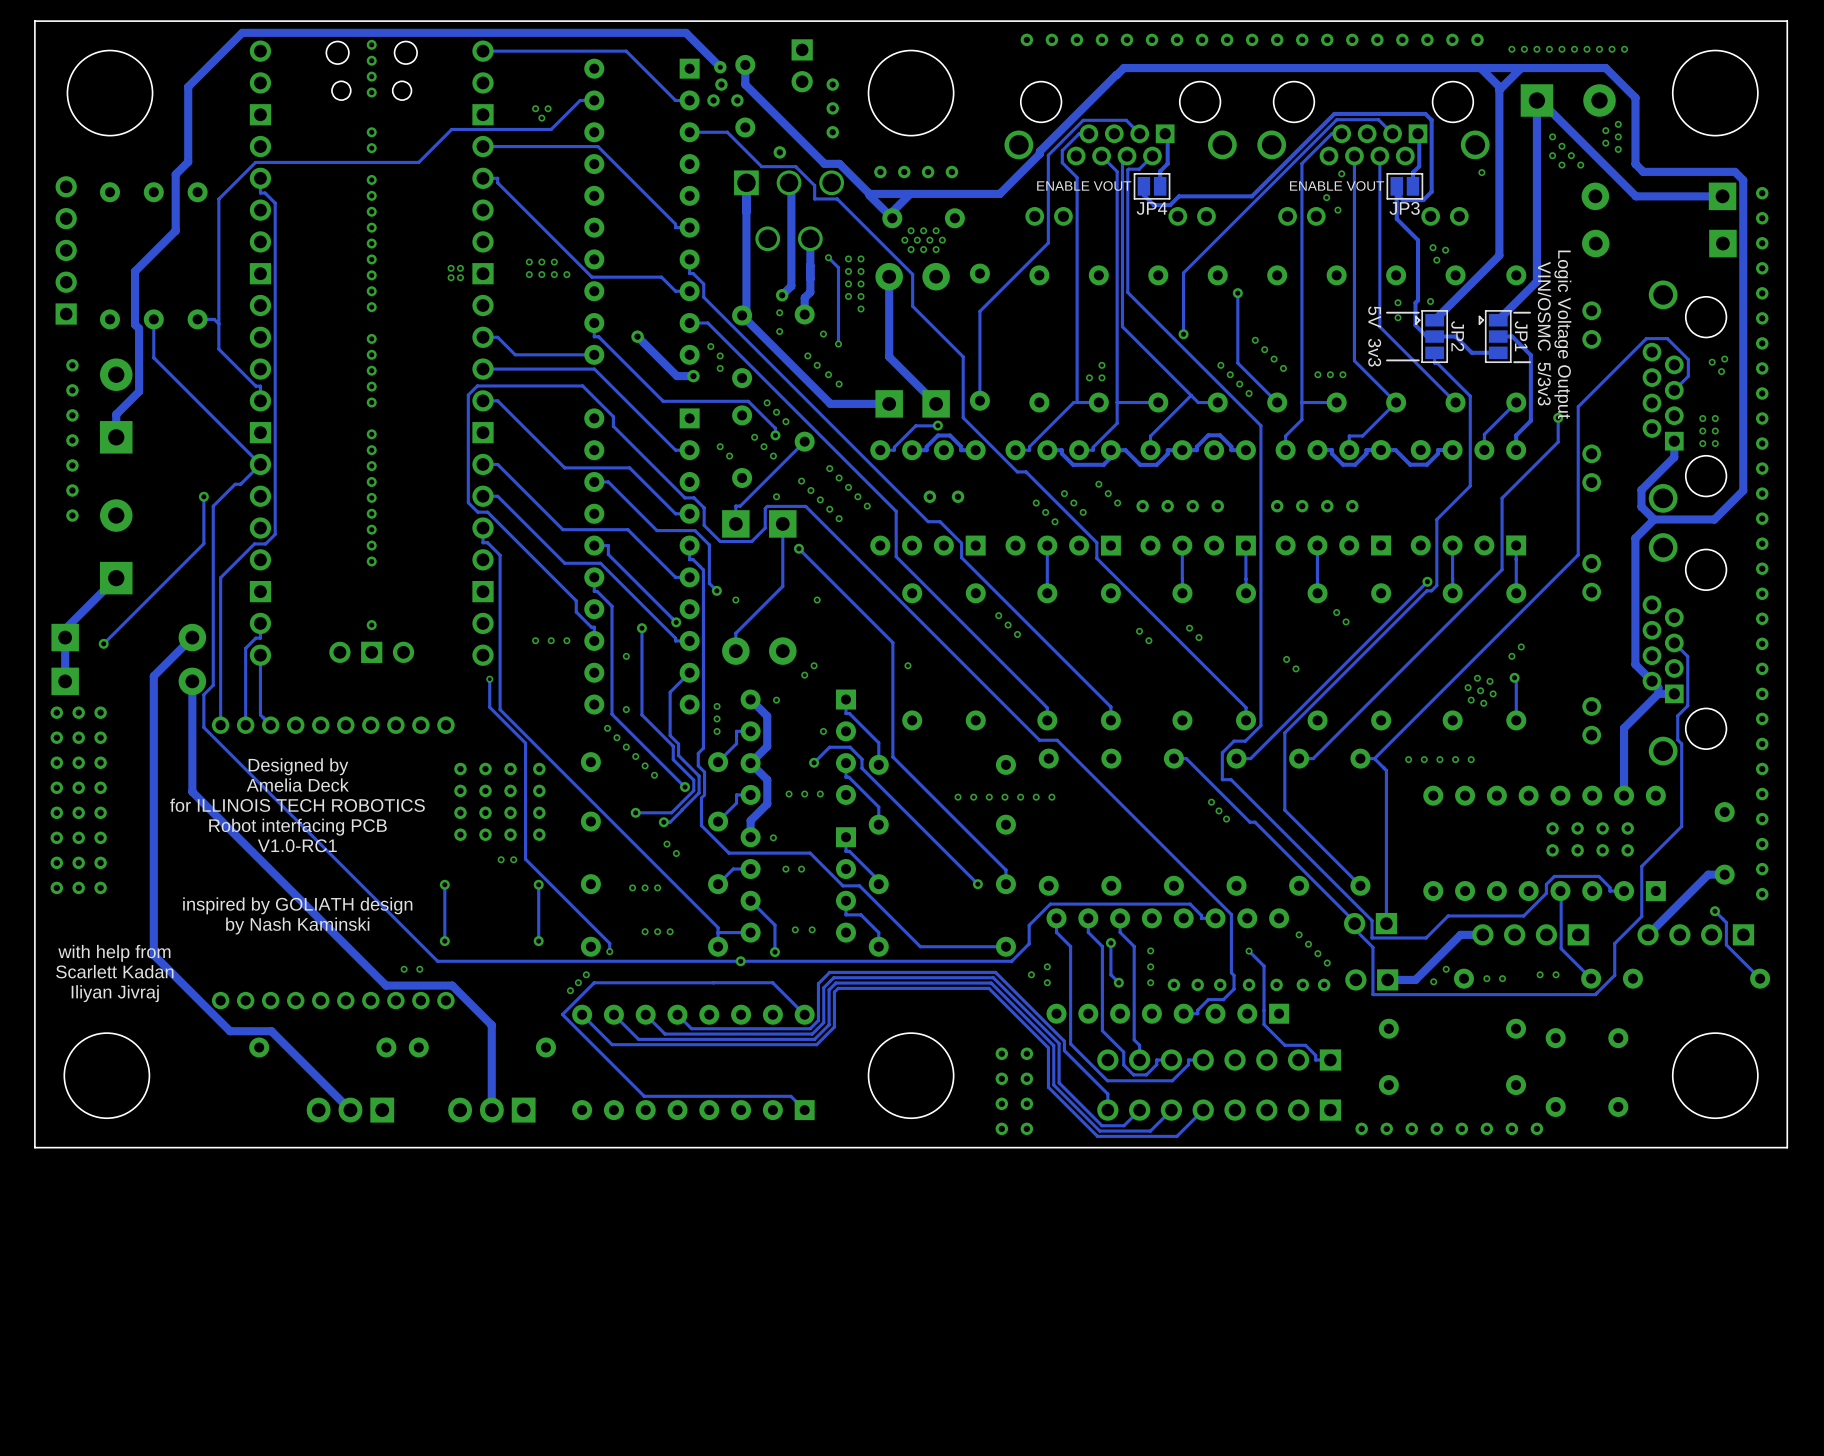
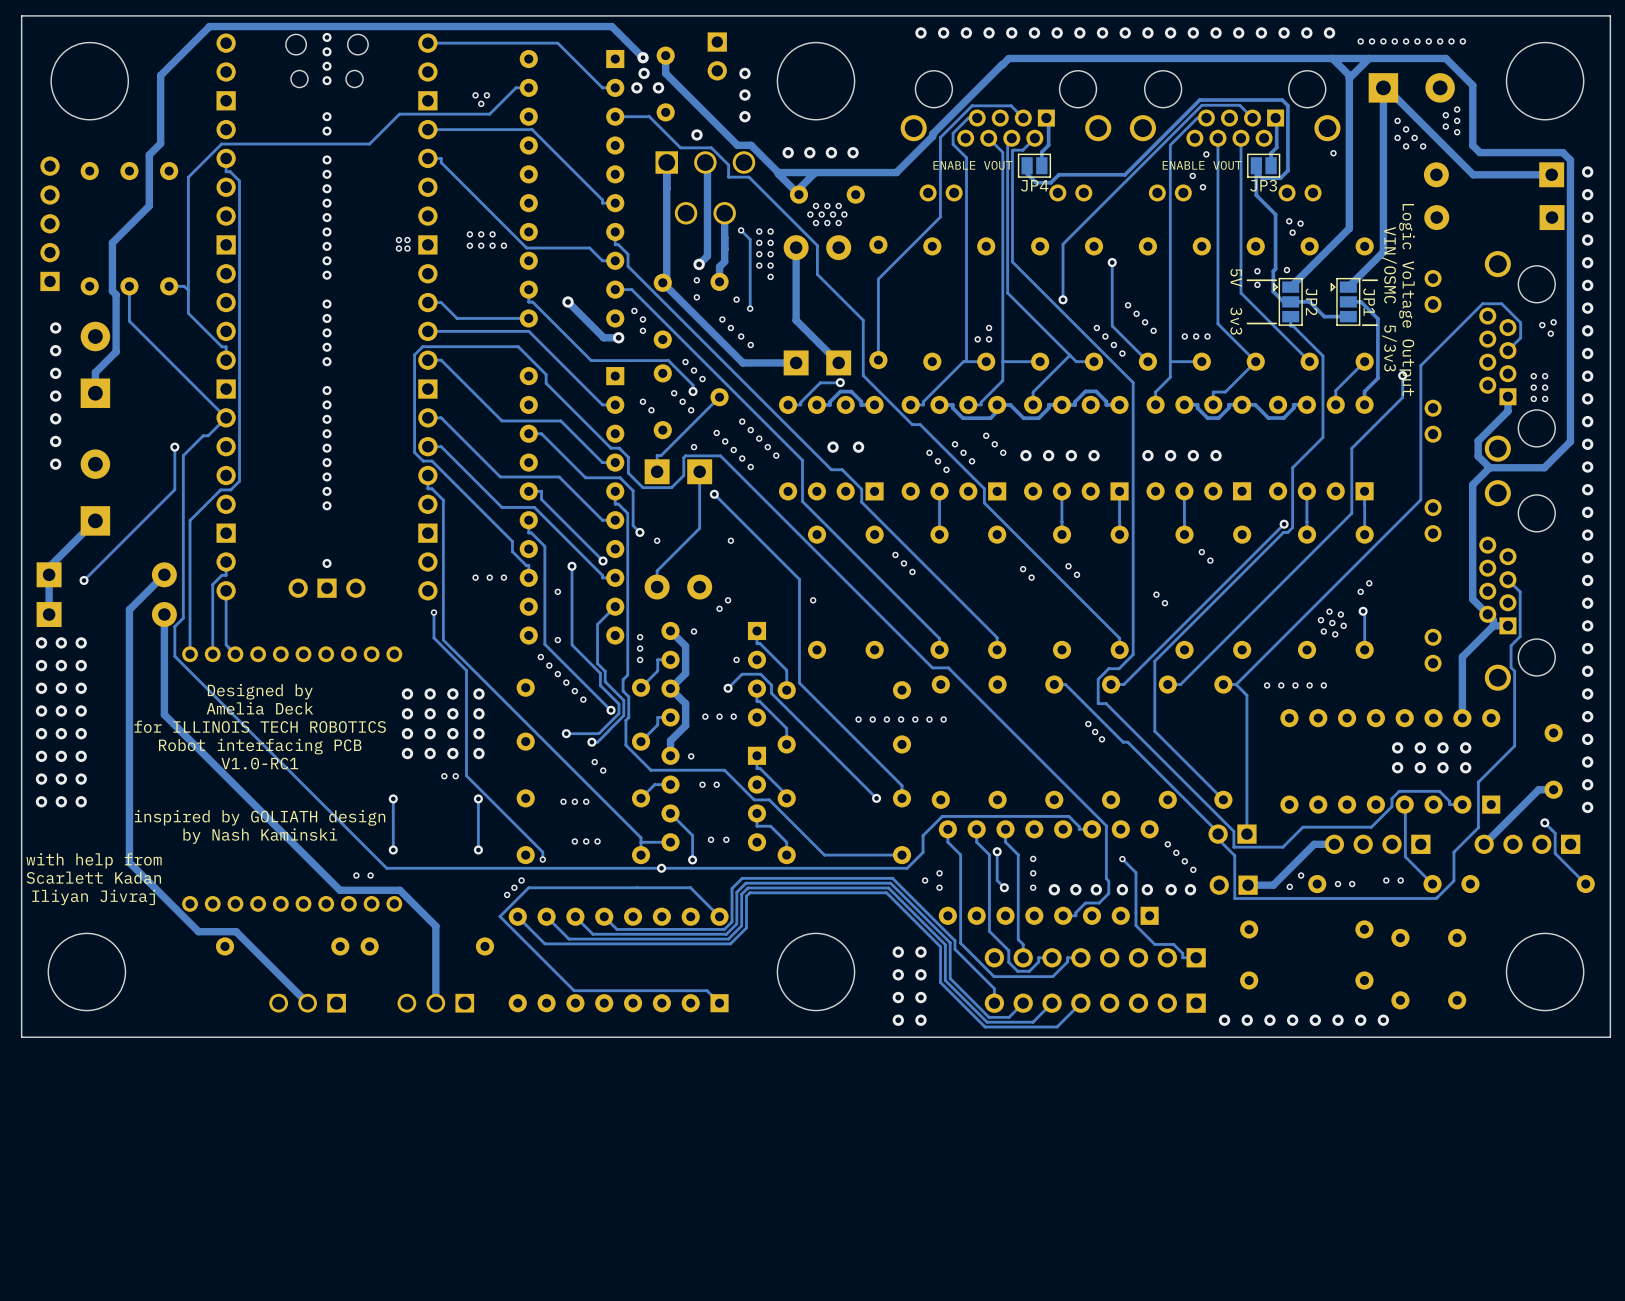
part footprint: [306, 1097, 395, 1123] -> [269, 993, 346, 1013]
part footprint: [448, 1097, 536, 1123] -> [397, 993, 475, 1013]

